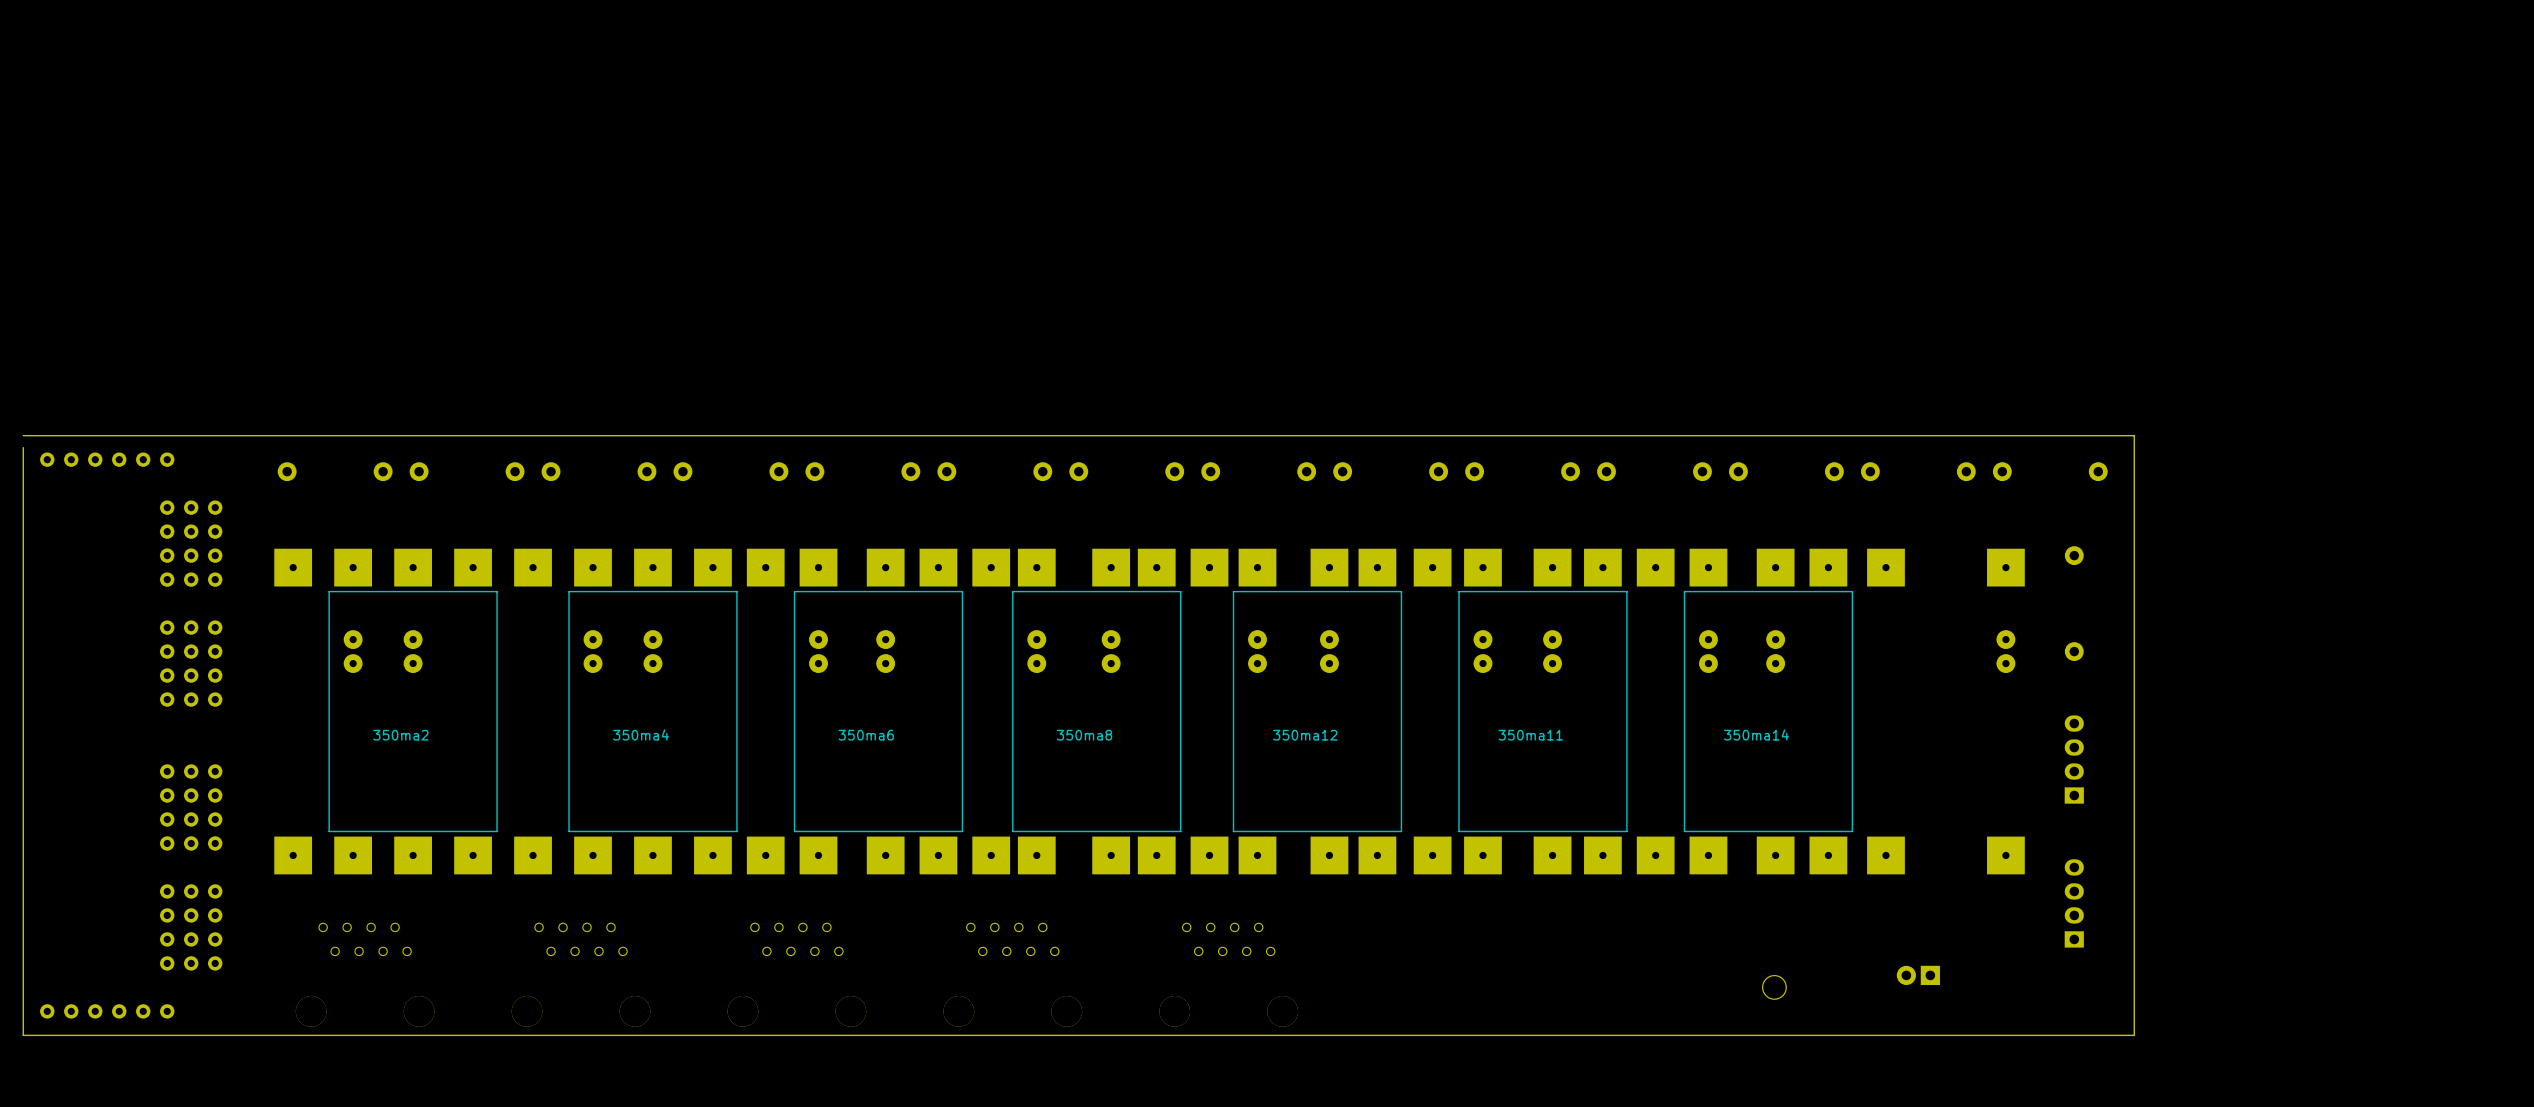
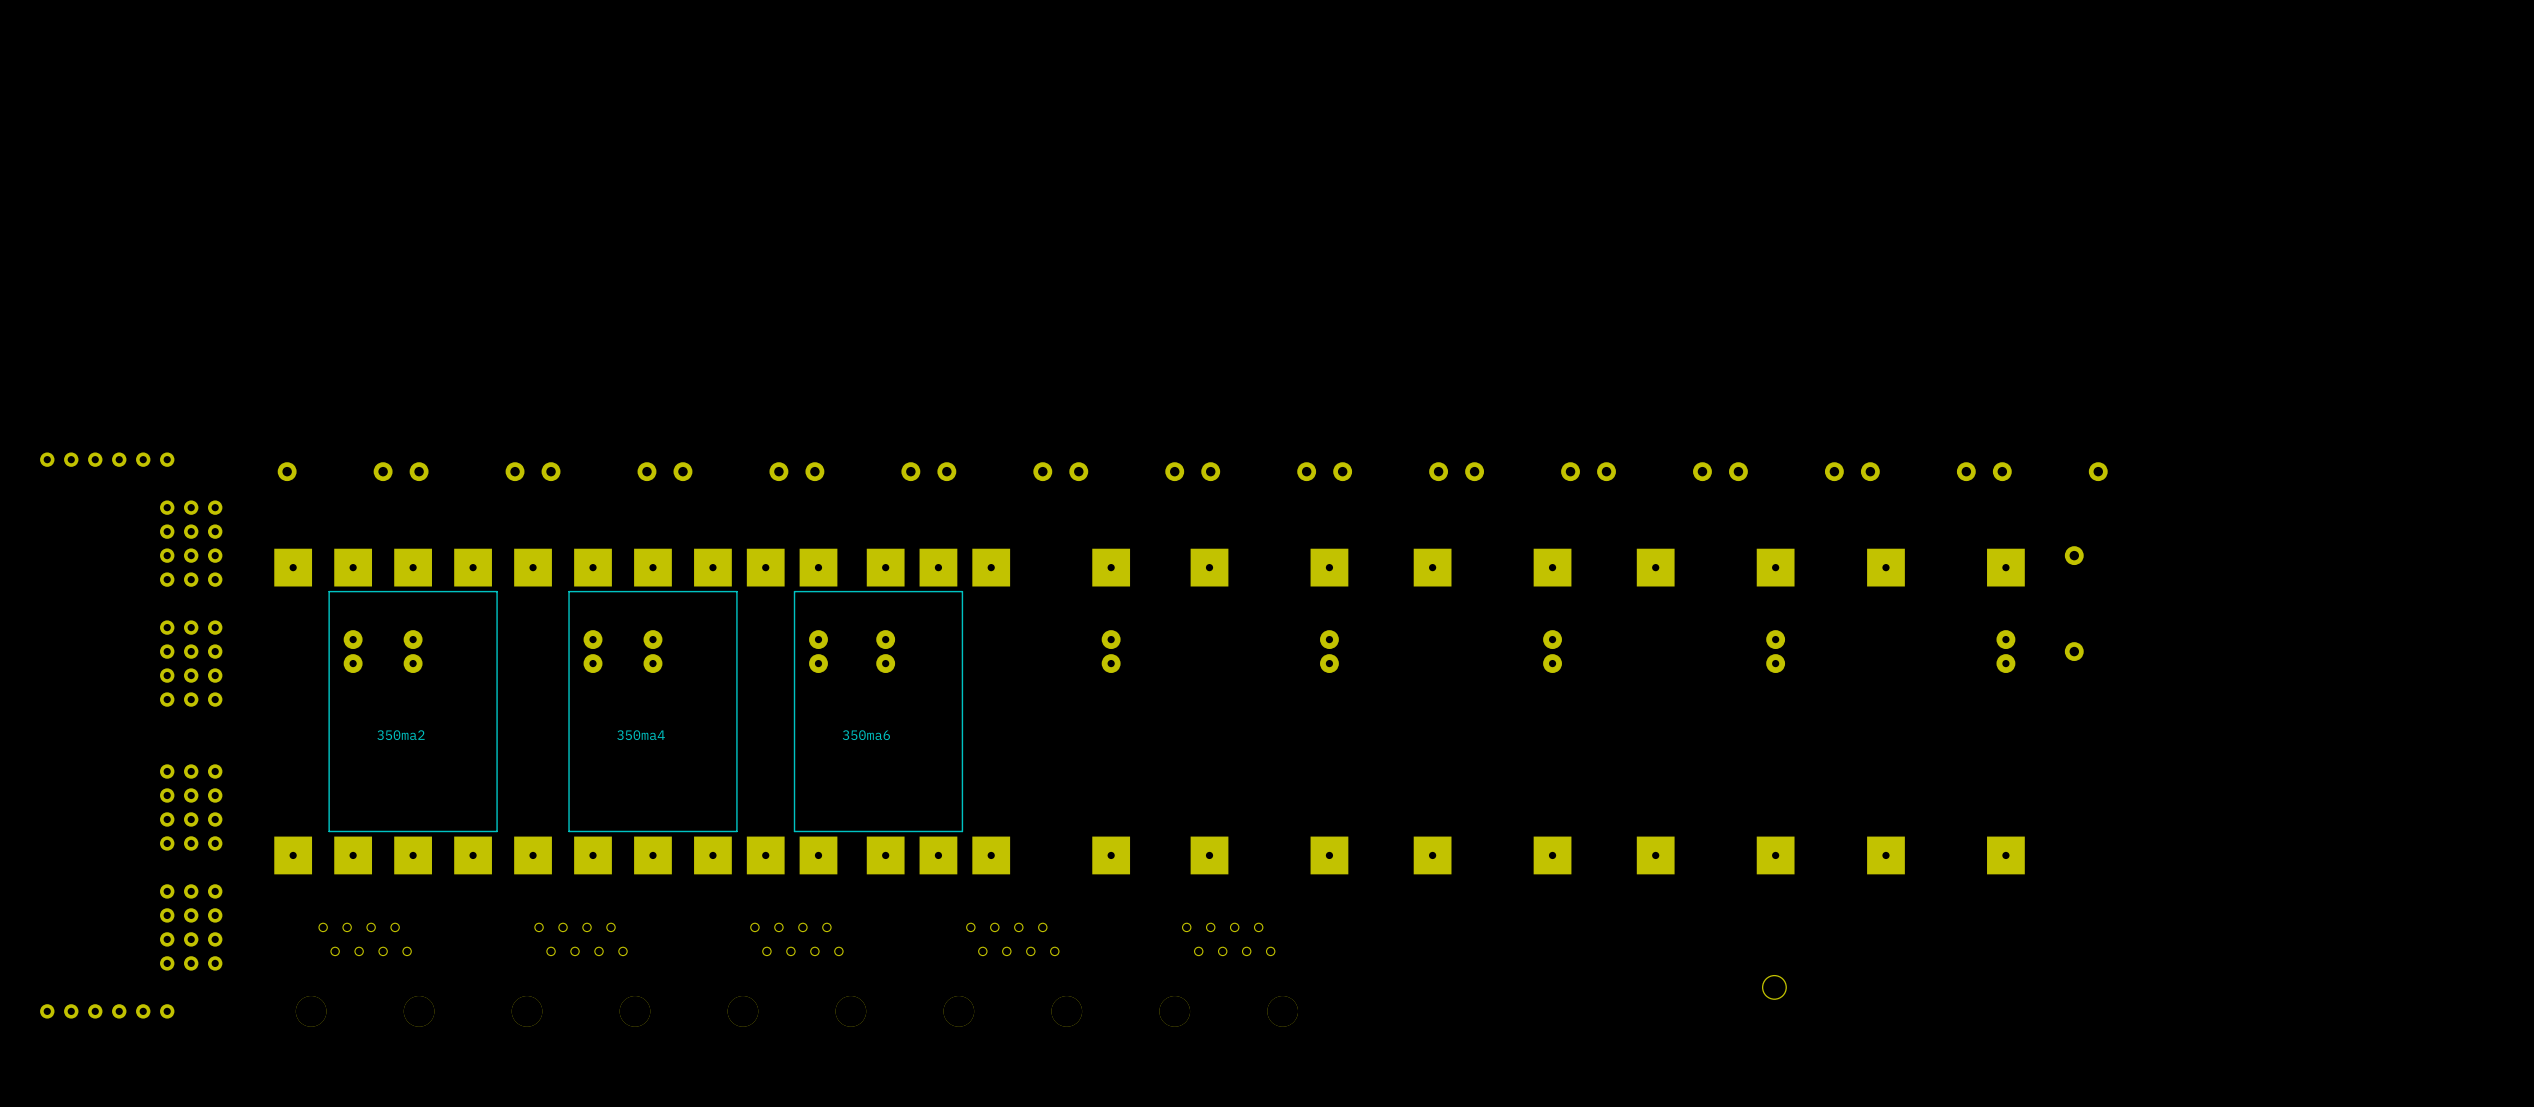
board edge: (23, 435) (2134, 435) (2134, 1035) (23, 1035) (23, 447) -> none
350ma8: (1096, 711) -> none
350ma12: (1317, 711) -> none
350ma11: (1542, 711) -> none
350ma14: (1768, 711) -> none
part: (2074, 759) -> none
part: (2074, 903) -> none
part: (1918, 975) -> none

